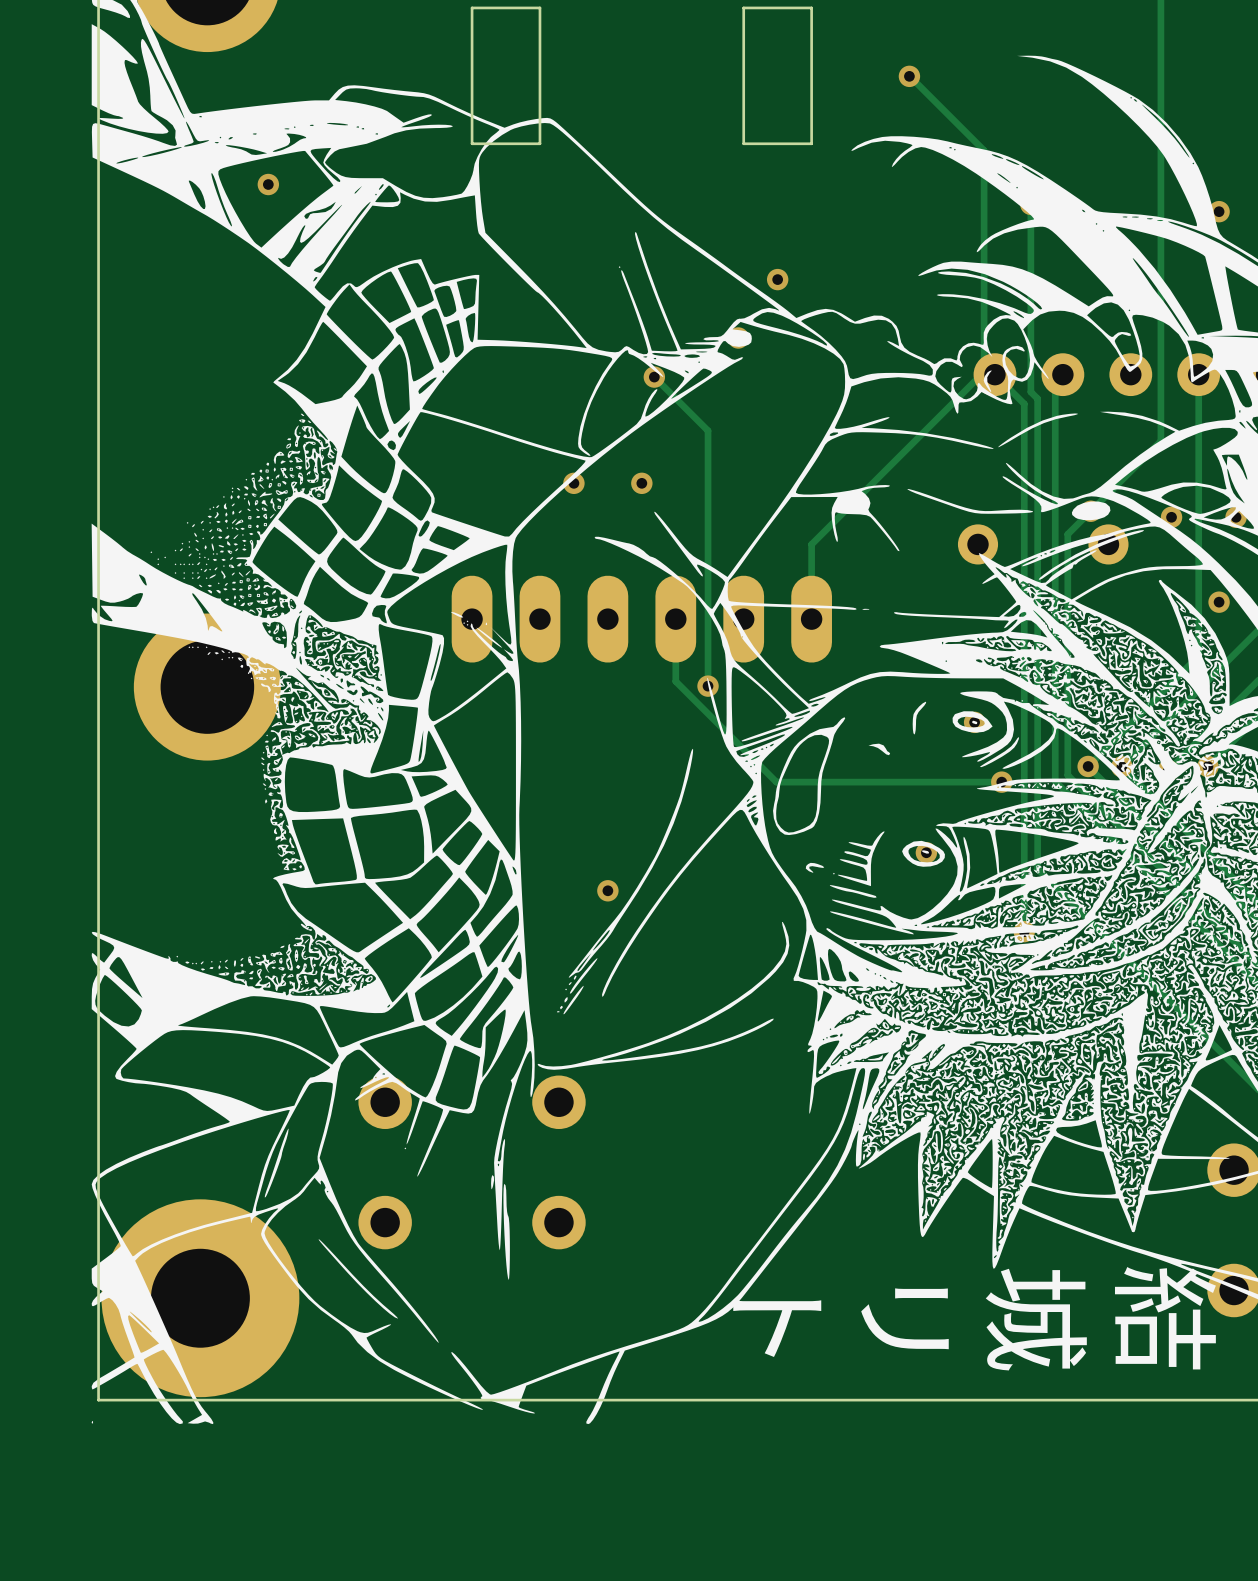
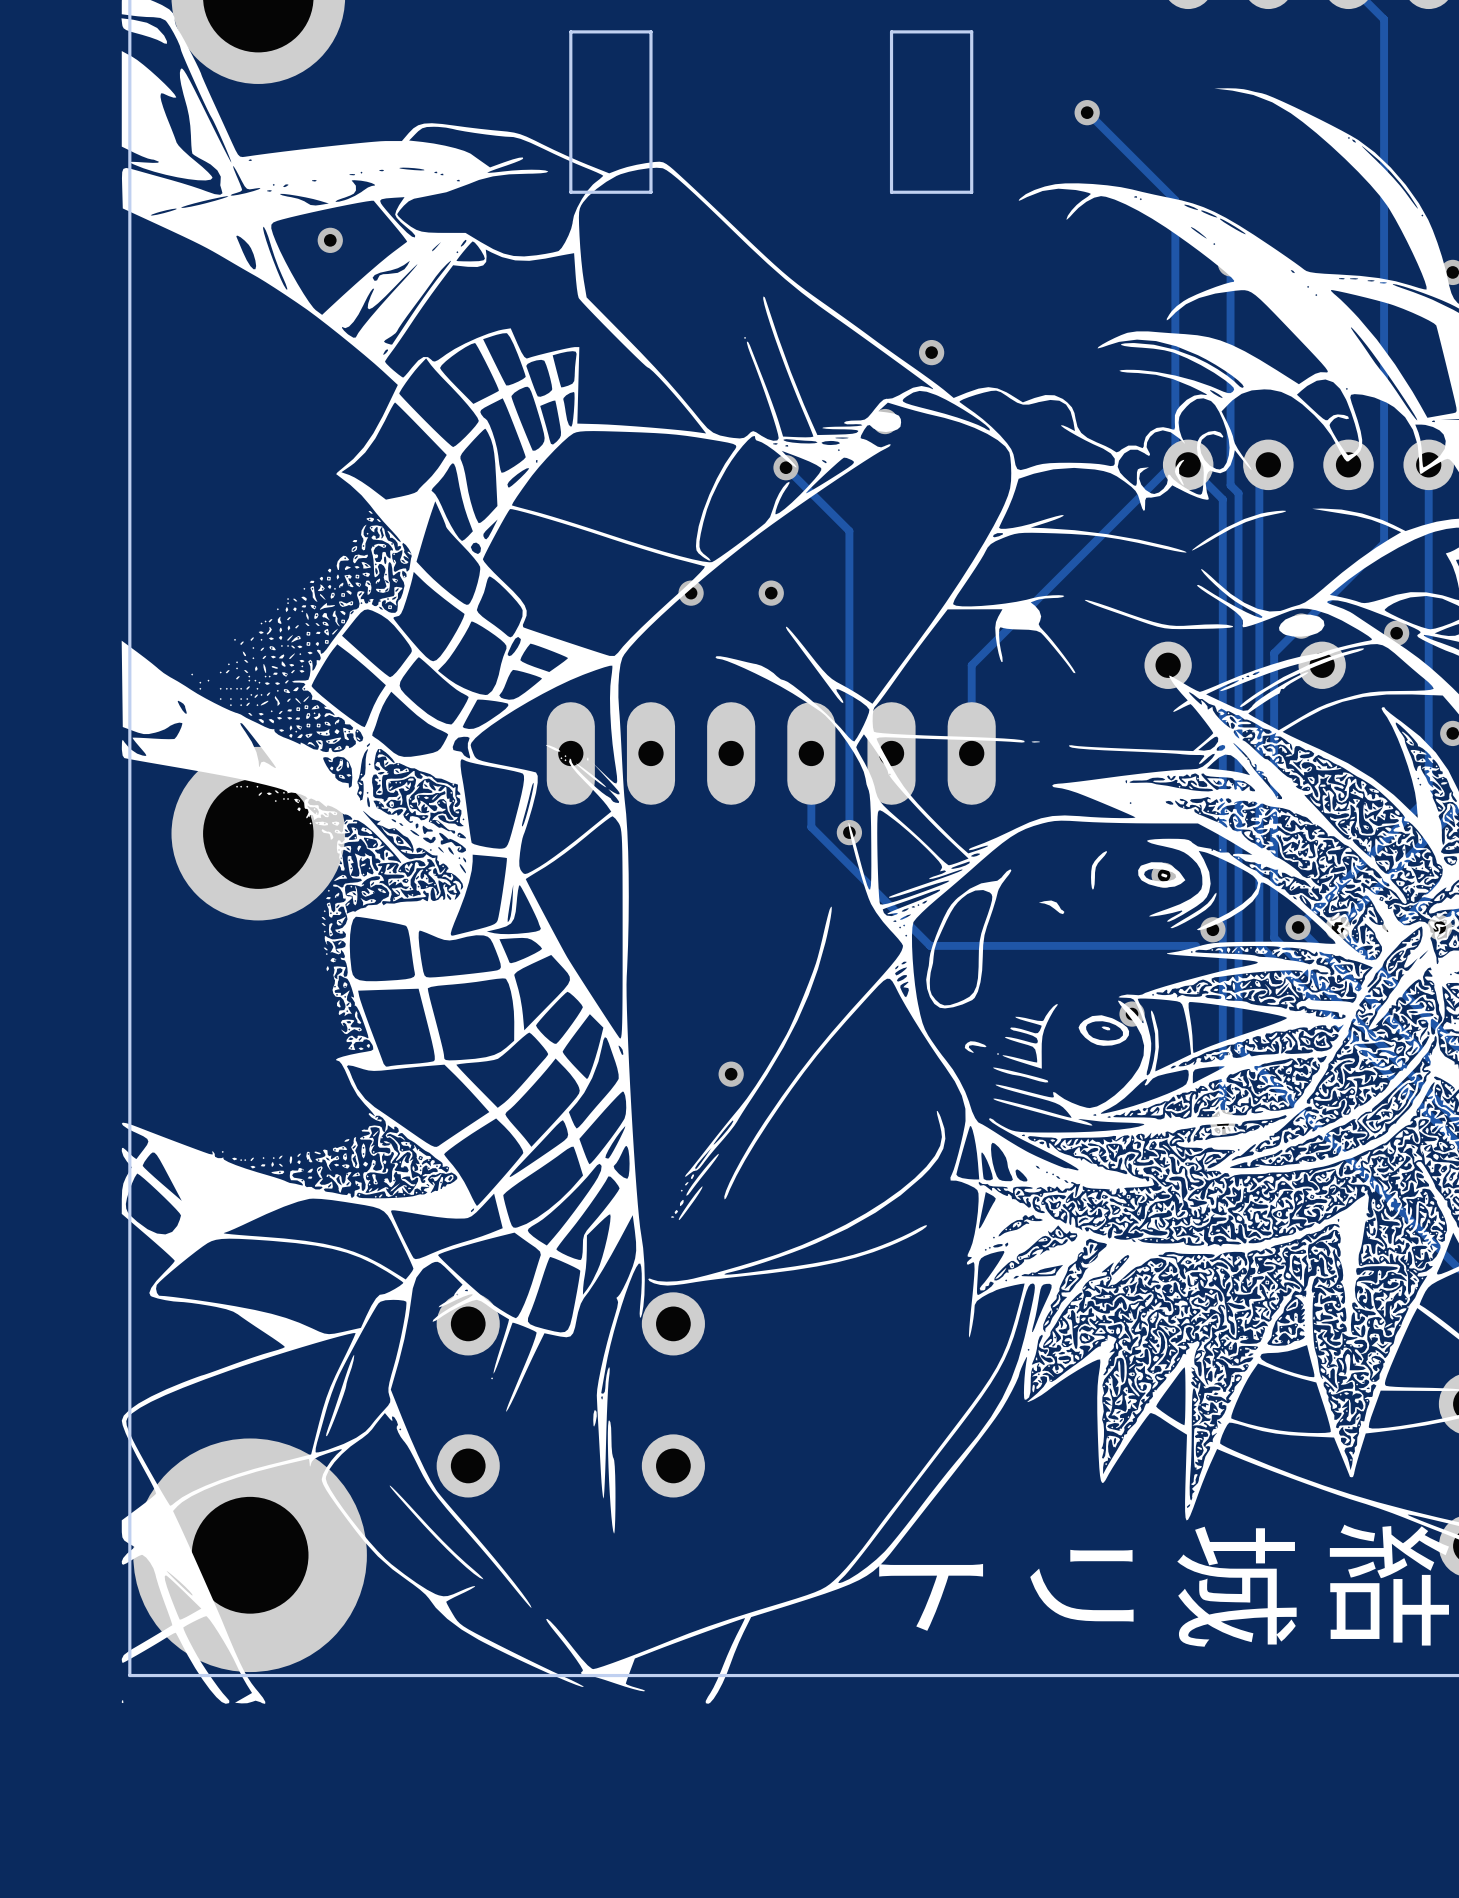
via position: (1001, 782) -> (1212, 929)
via position: (926, 852) -> (1132, 1014)

